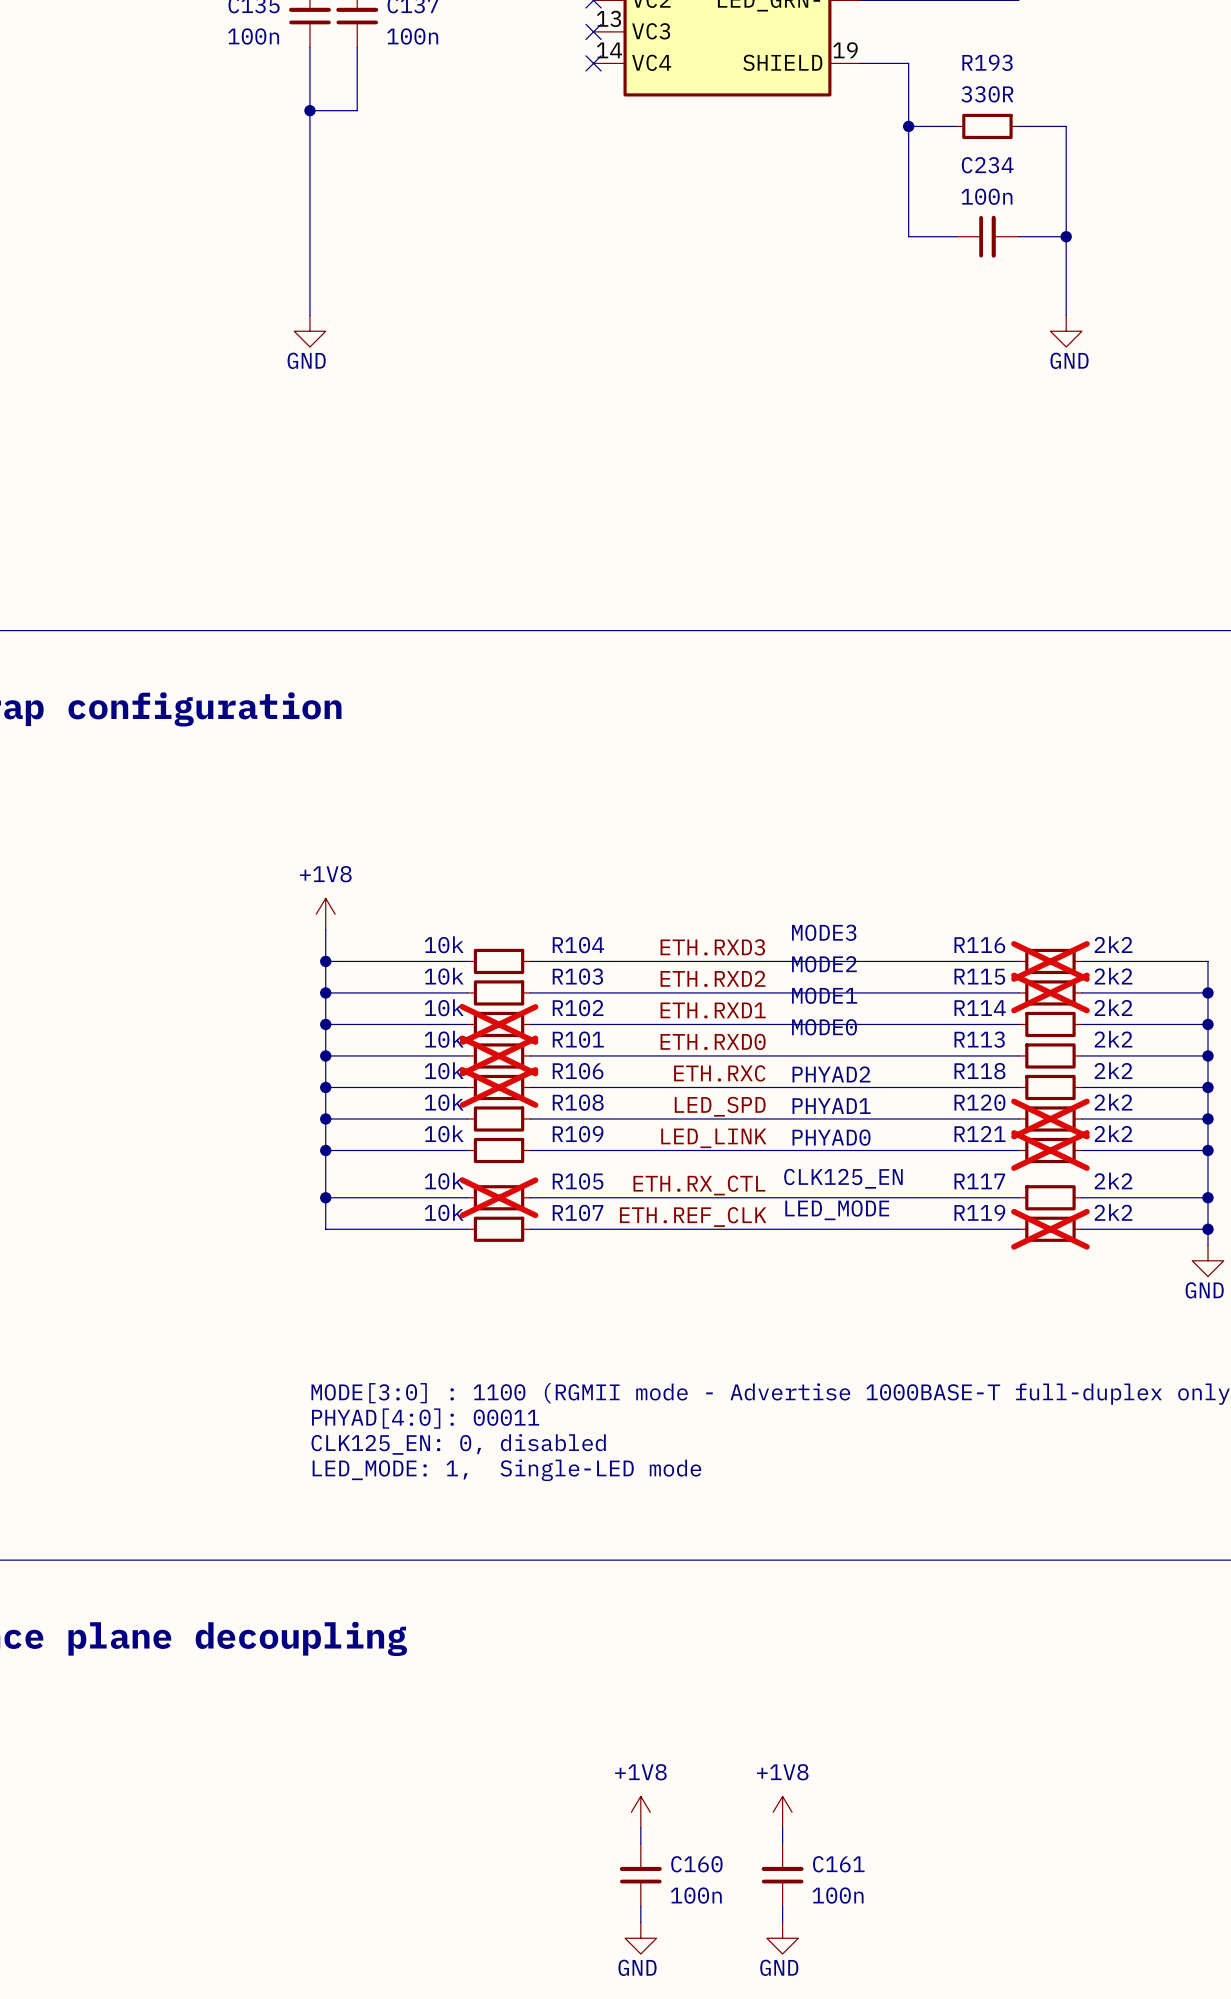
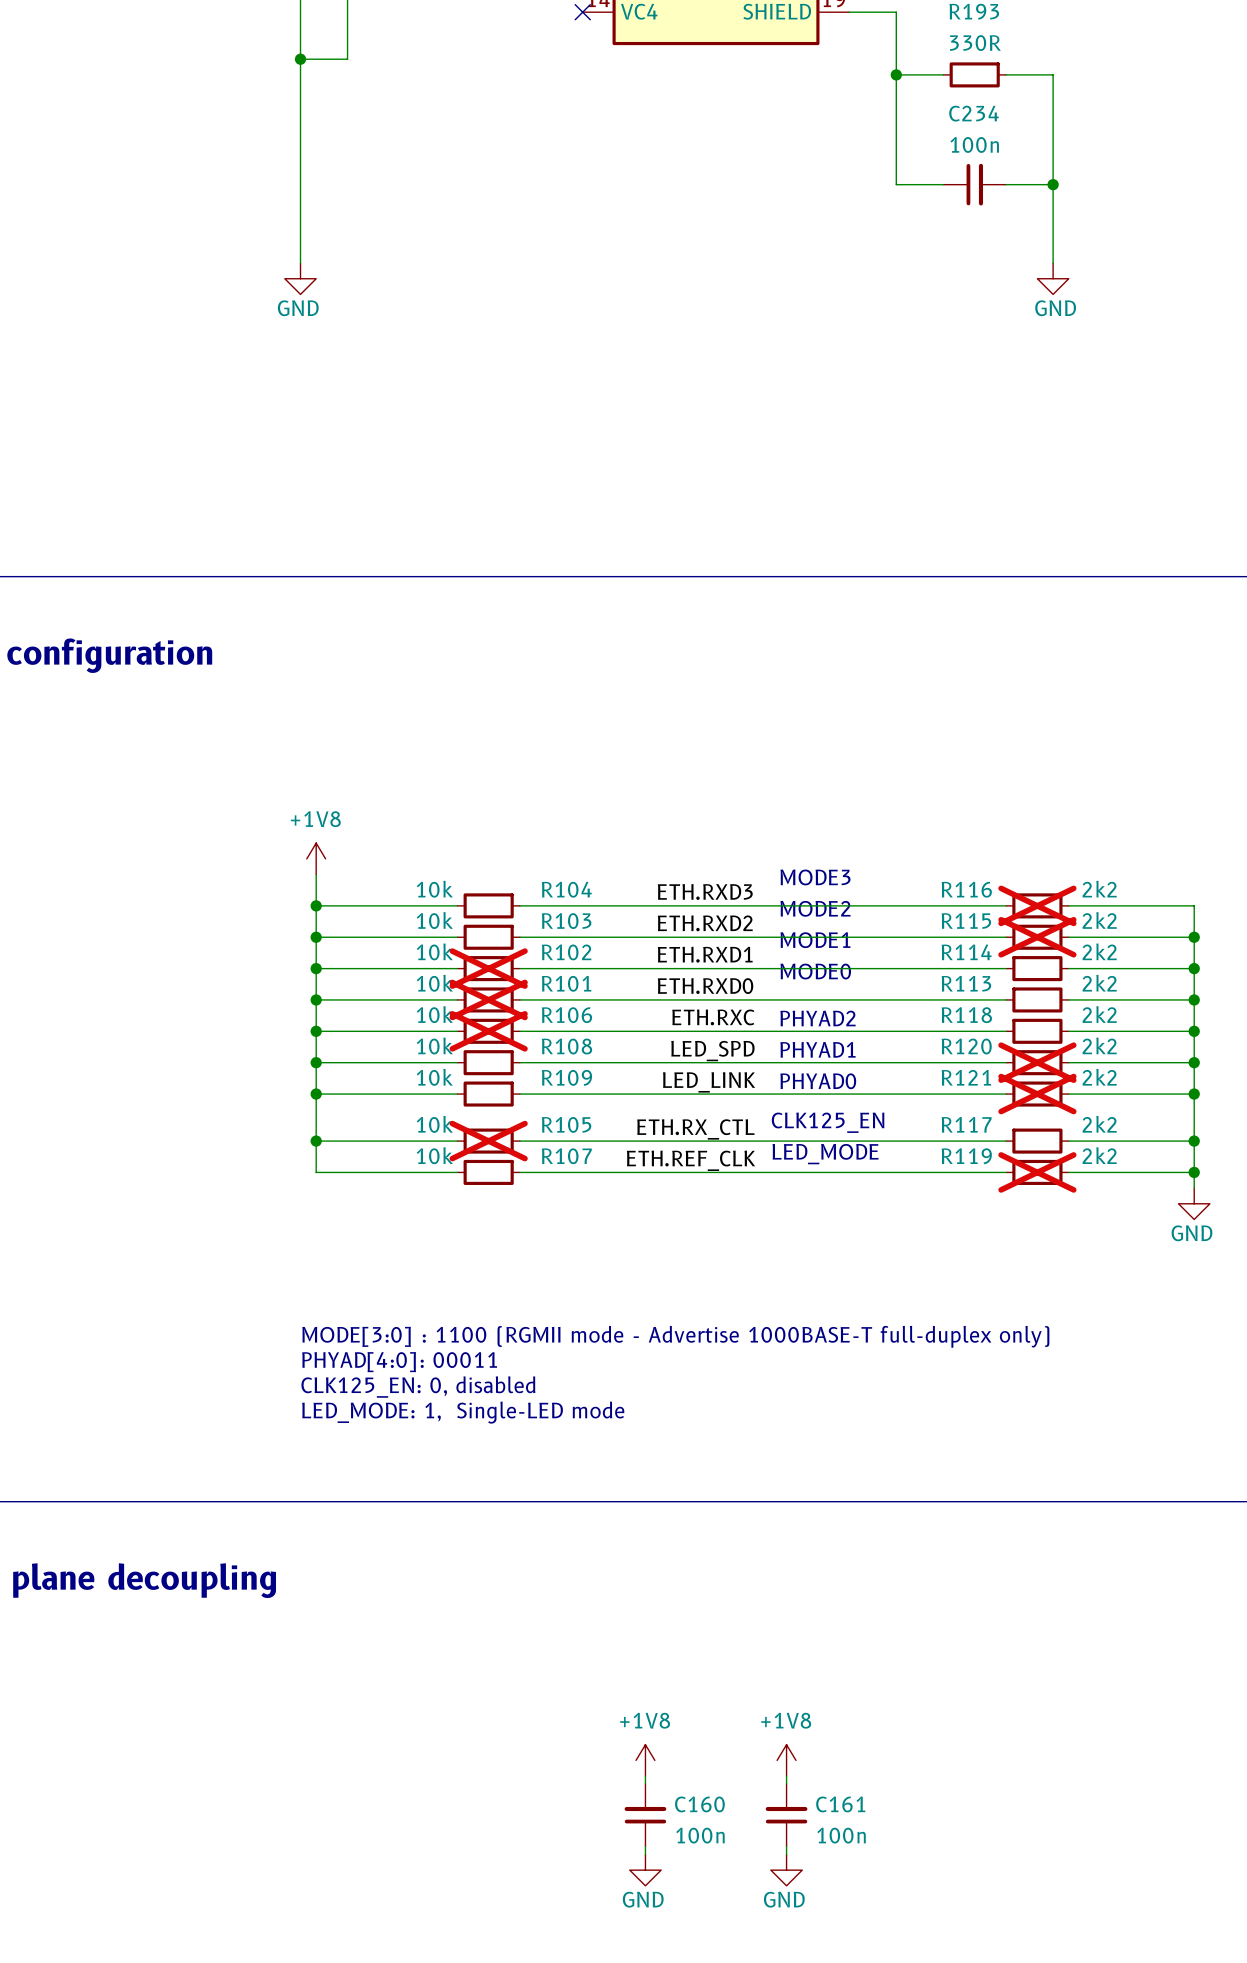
power symbol position: +1V8 (640, 1812) -> +1V8 (645, 1760)
power symbol position: +1V8 (782, 1812) -> +1V8 (786, 1760)
wire: (640, 1827) (640, 1843) -> none
wire: (782, 1827) (782, 1843) -> none
wire: none -> (645, 1776) (645, 1783)
wire: none -> (786, 1776) (786, 1783)
C160 position: (640, 1875) -> (645, 1815)
C161 position: (782, 1875) -> (786, 1815)
wire: (640, 1906) (640, 1922) -> none
wire: none -> (645, 1846) (645, 1854)
wire: (782, 1906) (782, 1922) -> none
wire: none -> (786, 1846) (786, 1854)
power symbol position: GND (640, 1938) -> GND (645, 1870)
power symbol position: GND (782, 1938) -> GND (786, 1870)

